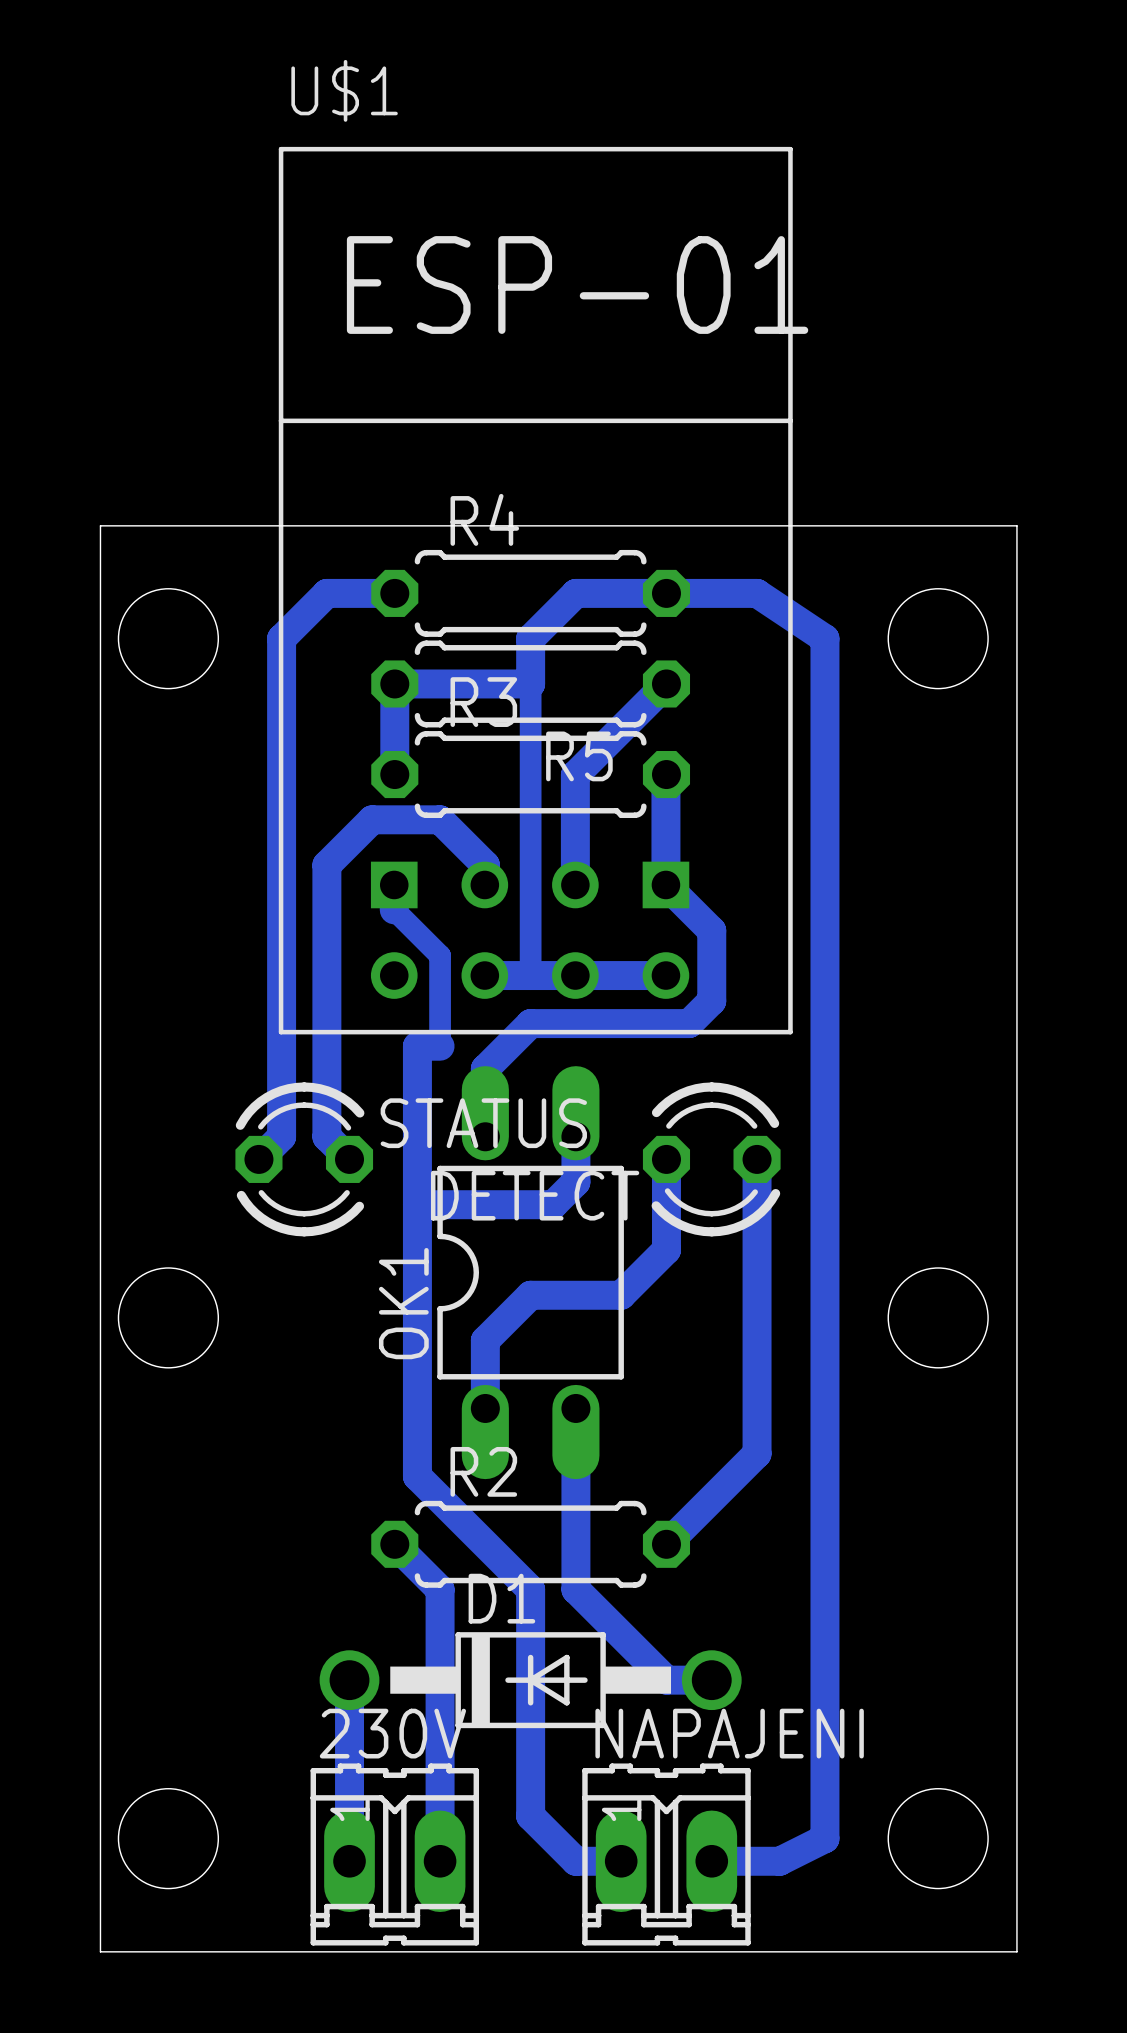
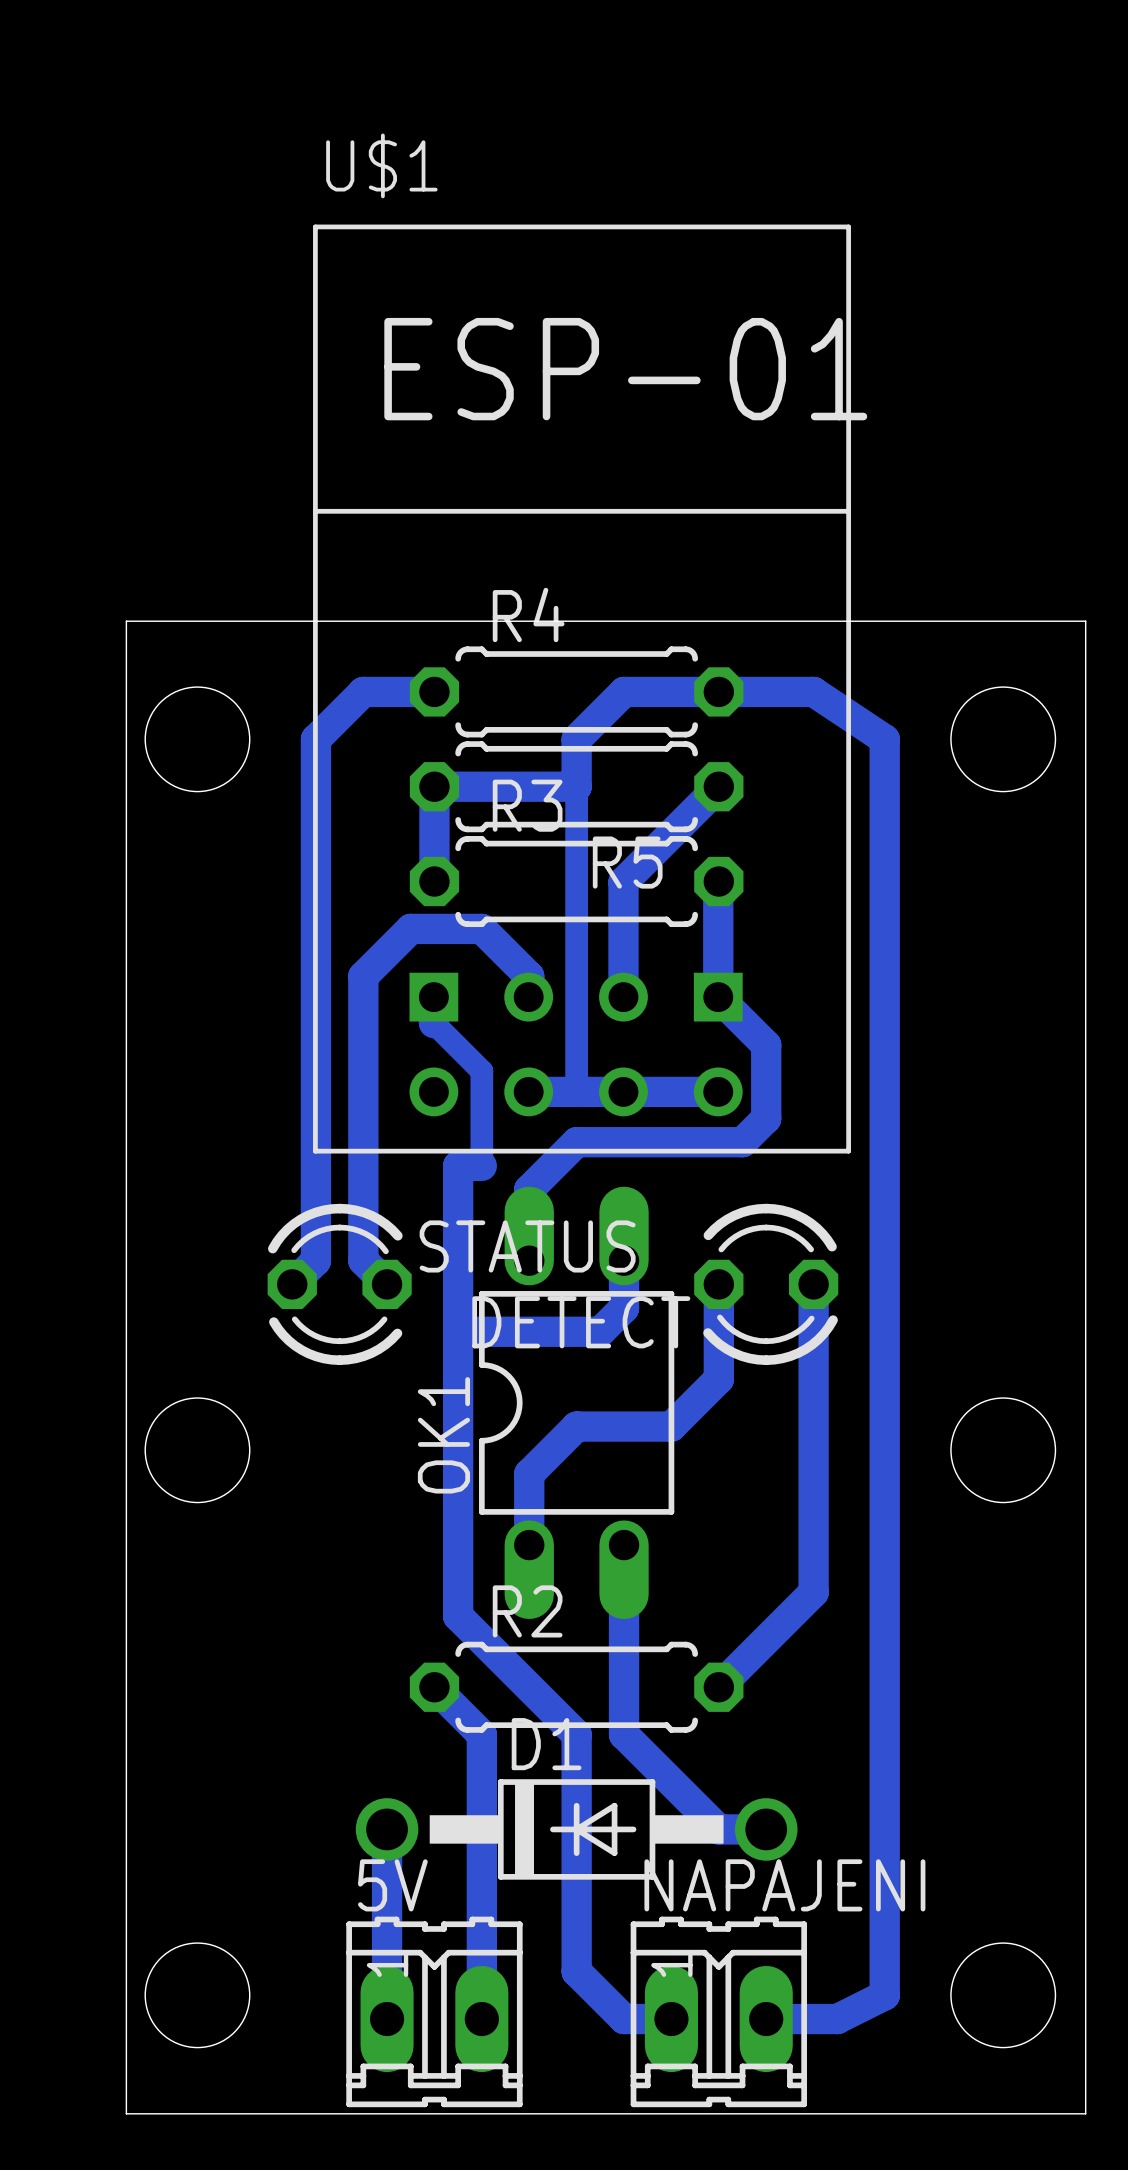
230V name: 230V (392, 1733) -> 5V (392, 1885)

